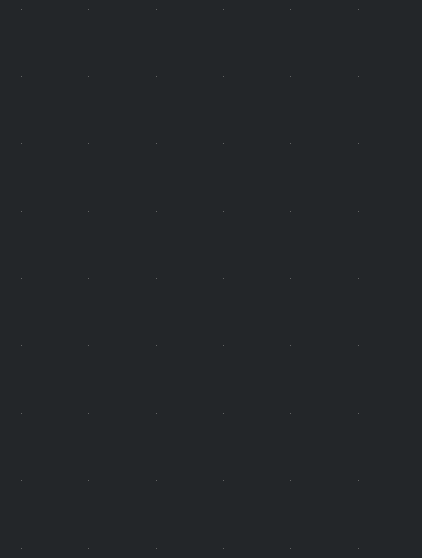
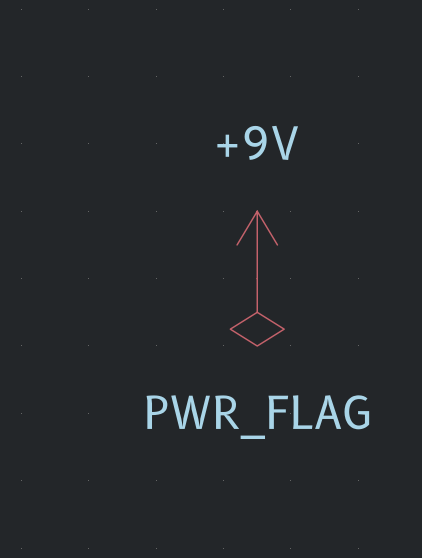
power symbol: none -> +9V (257, 244)
power symbol: none -> PWR_FLAG (257, 312)

